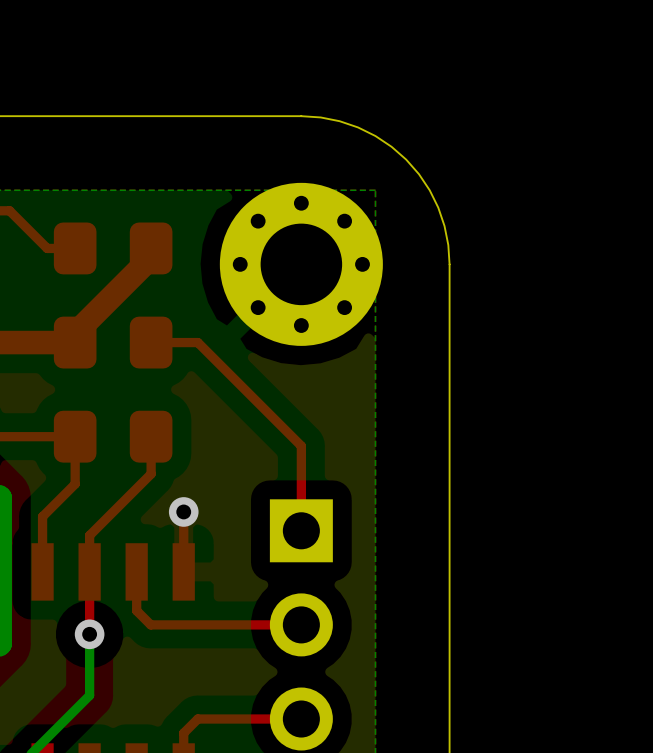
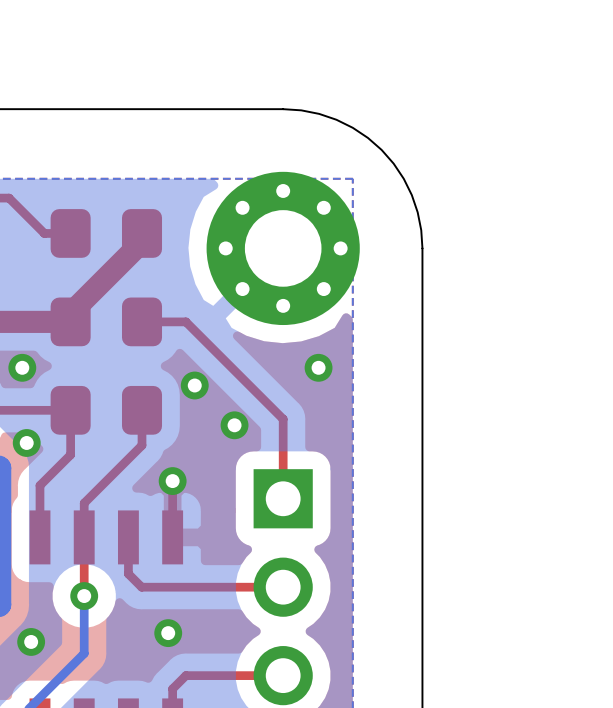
via: none -> (22, 367)
via: none -> (318, 367)
via: none -> (194, 385)
via: none -> (234, 425)
via: none -> (26, 442)
via: none -> (168, 633)
via: none -> (31, 641)

